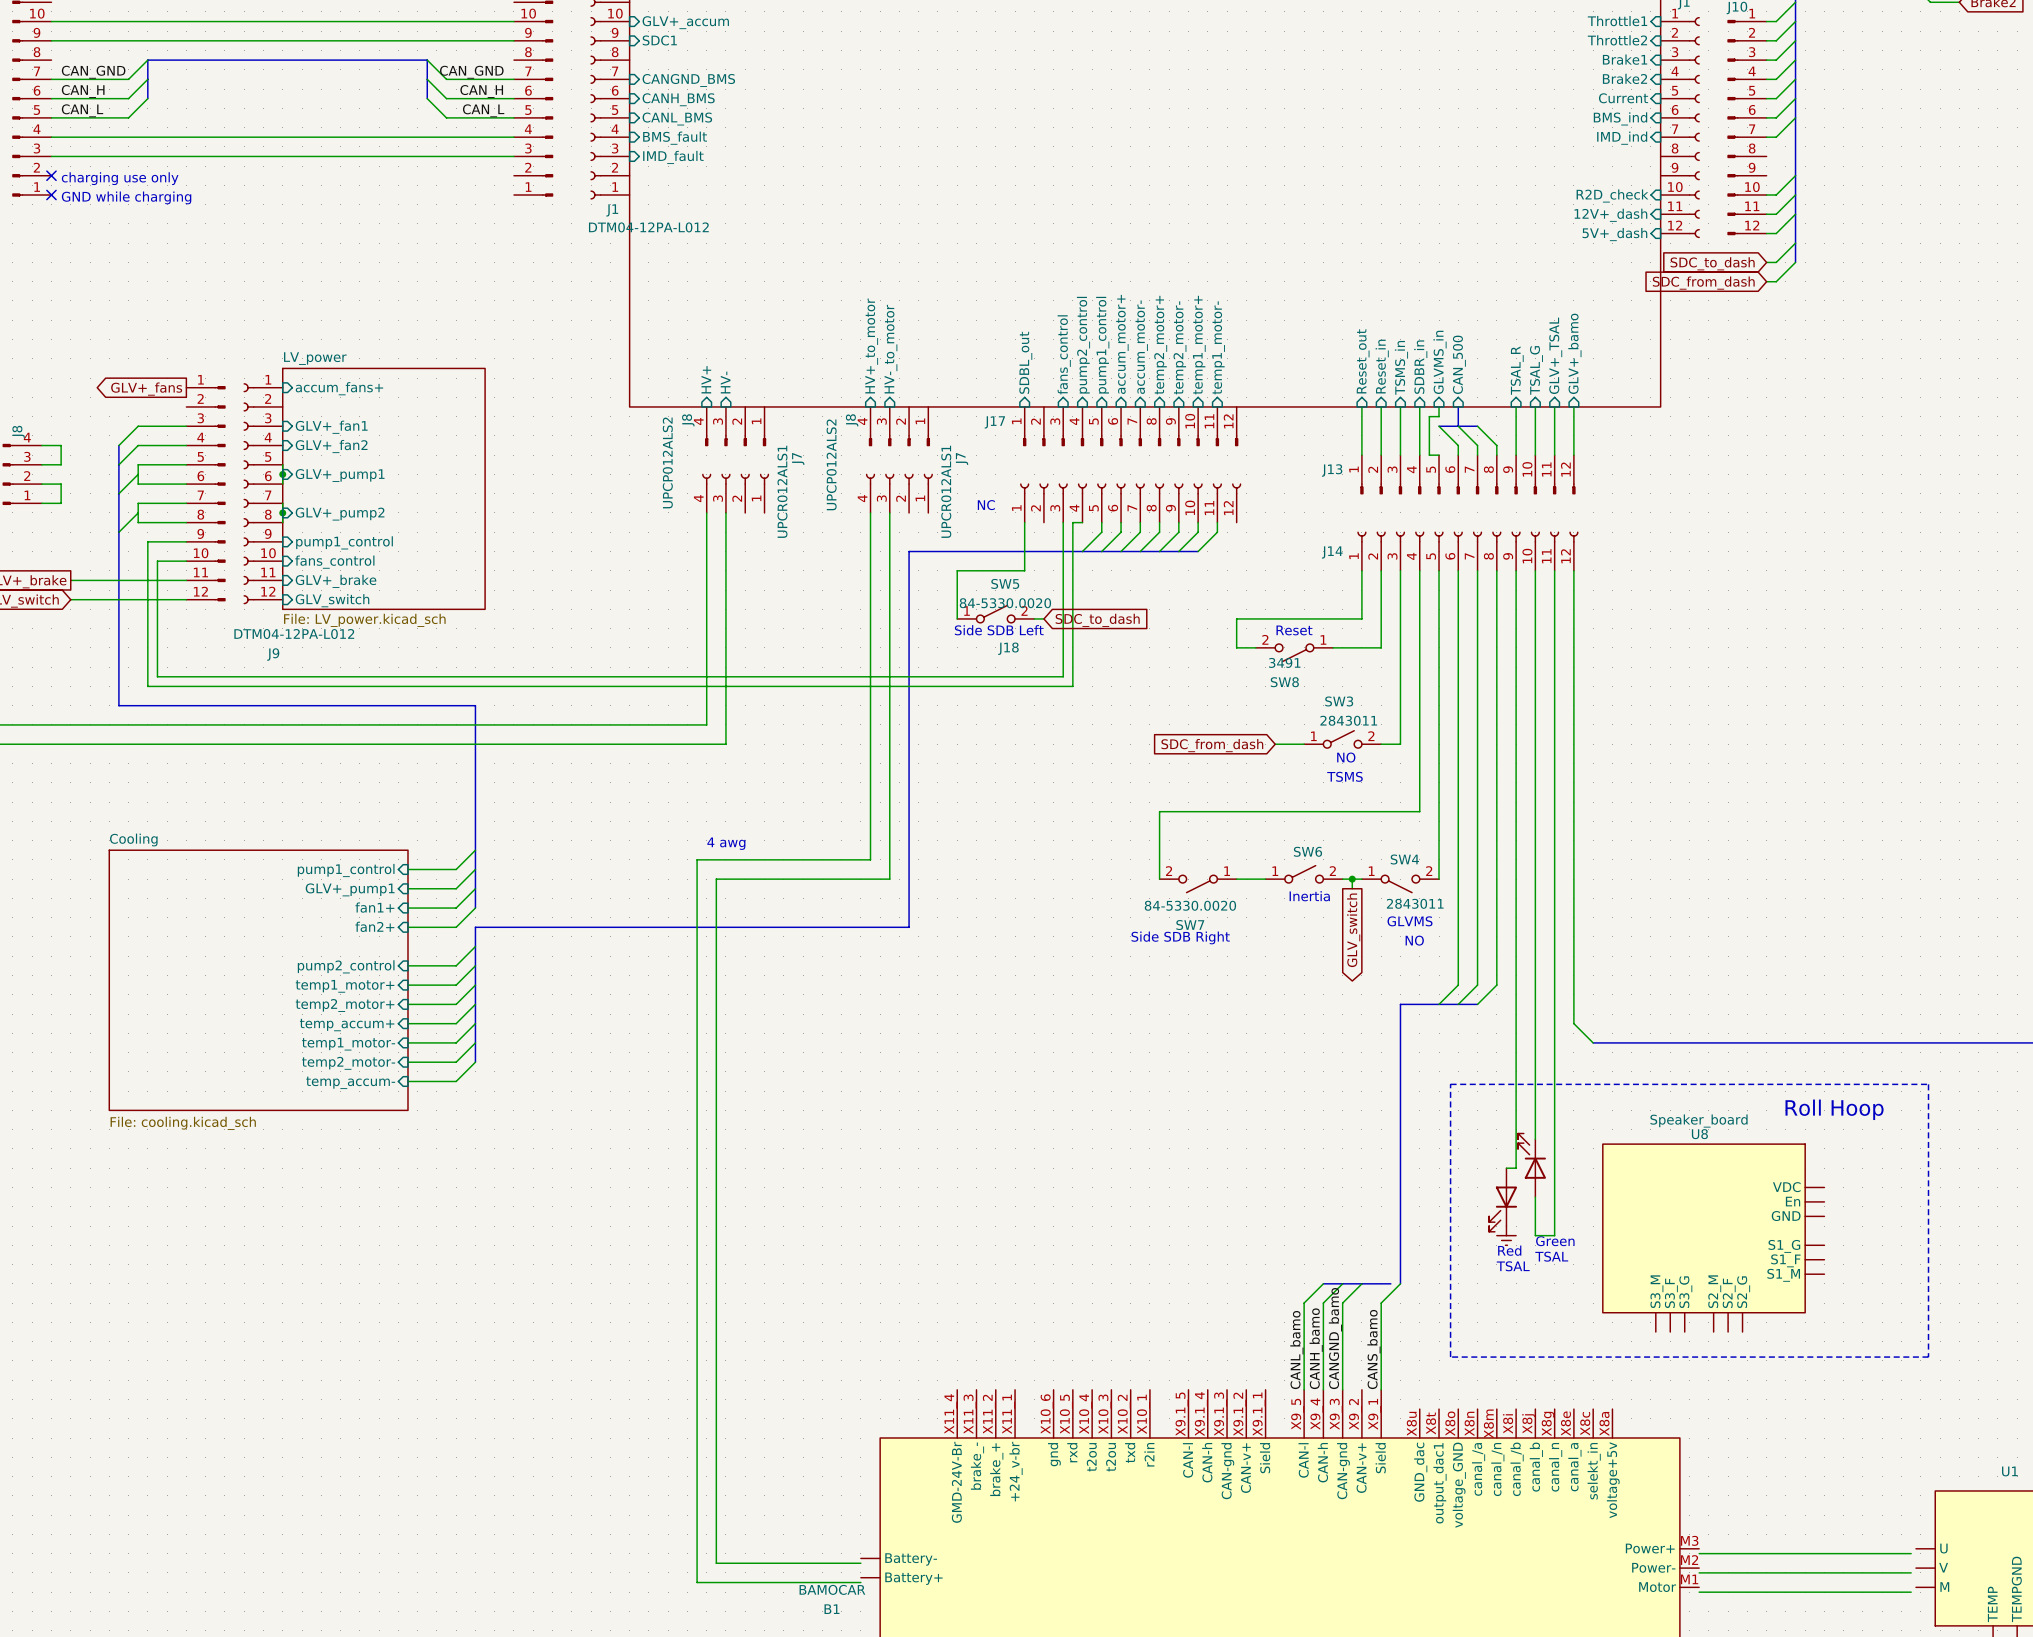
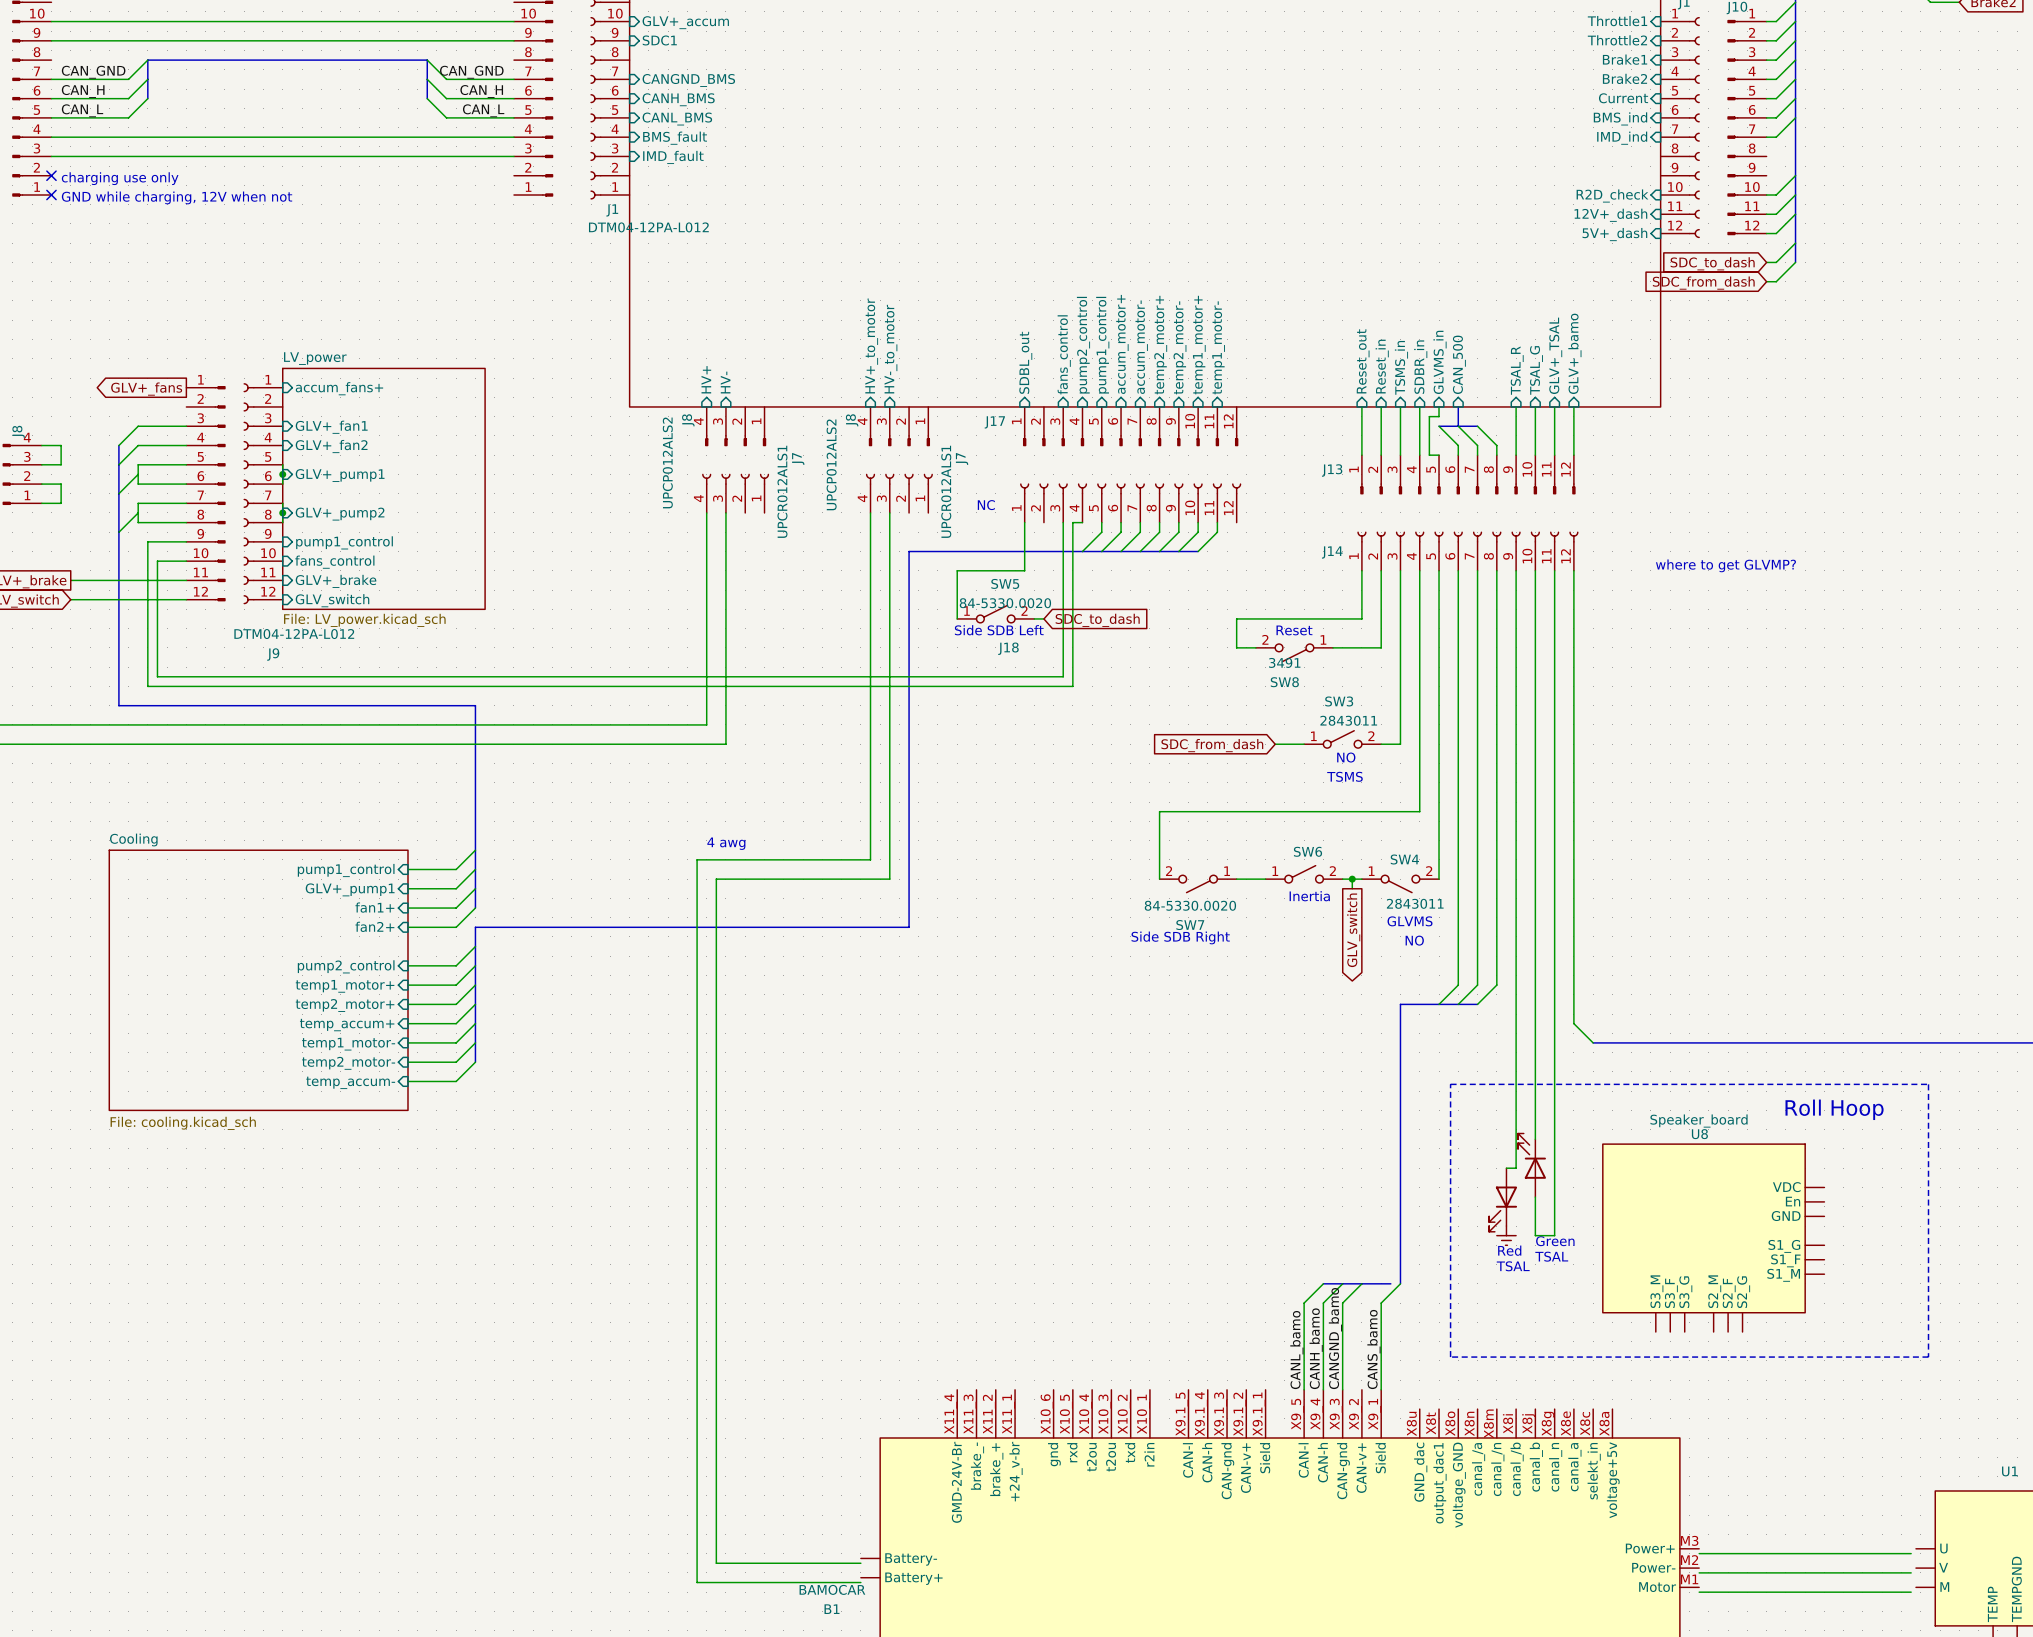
text: GND while charging (126, 197) -> GND while charging, 12V when not (177, 197)
text: none -> where to get GLVMP? (1725, 565)

